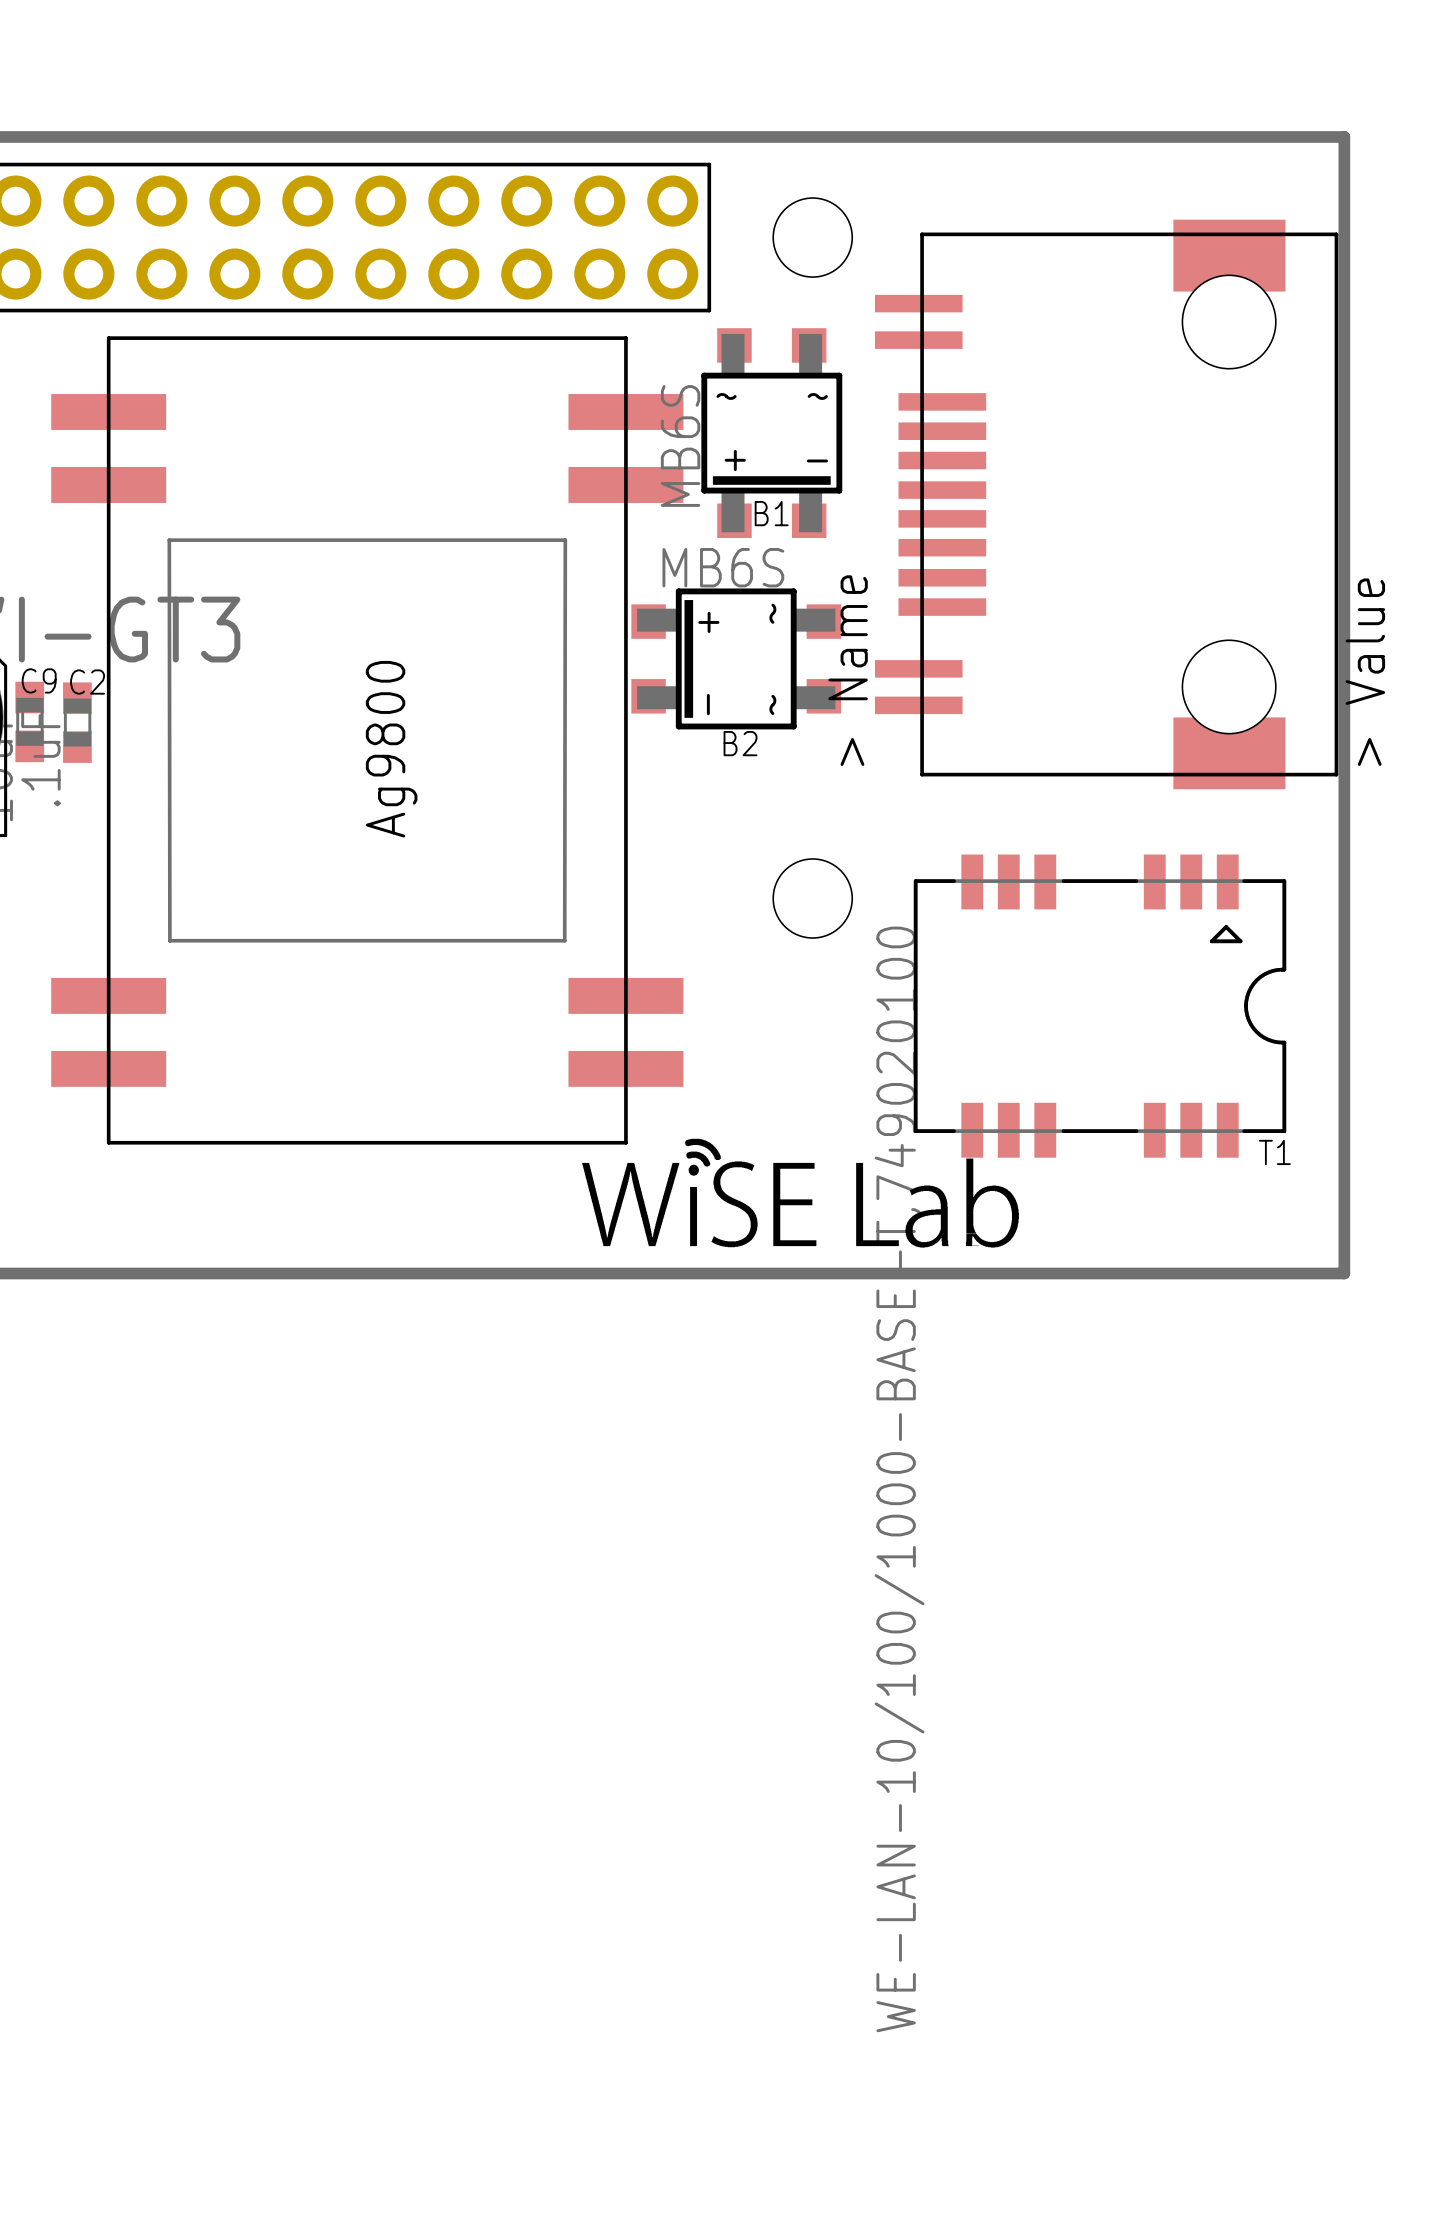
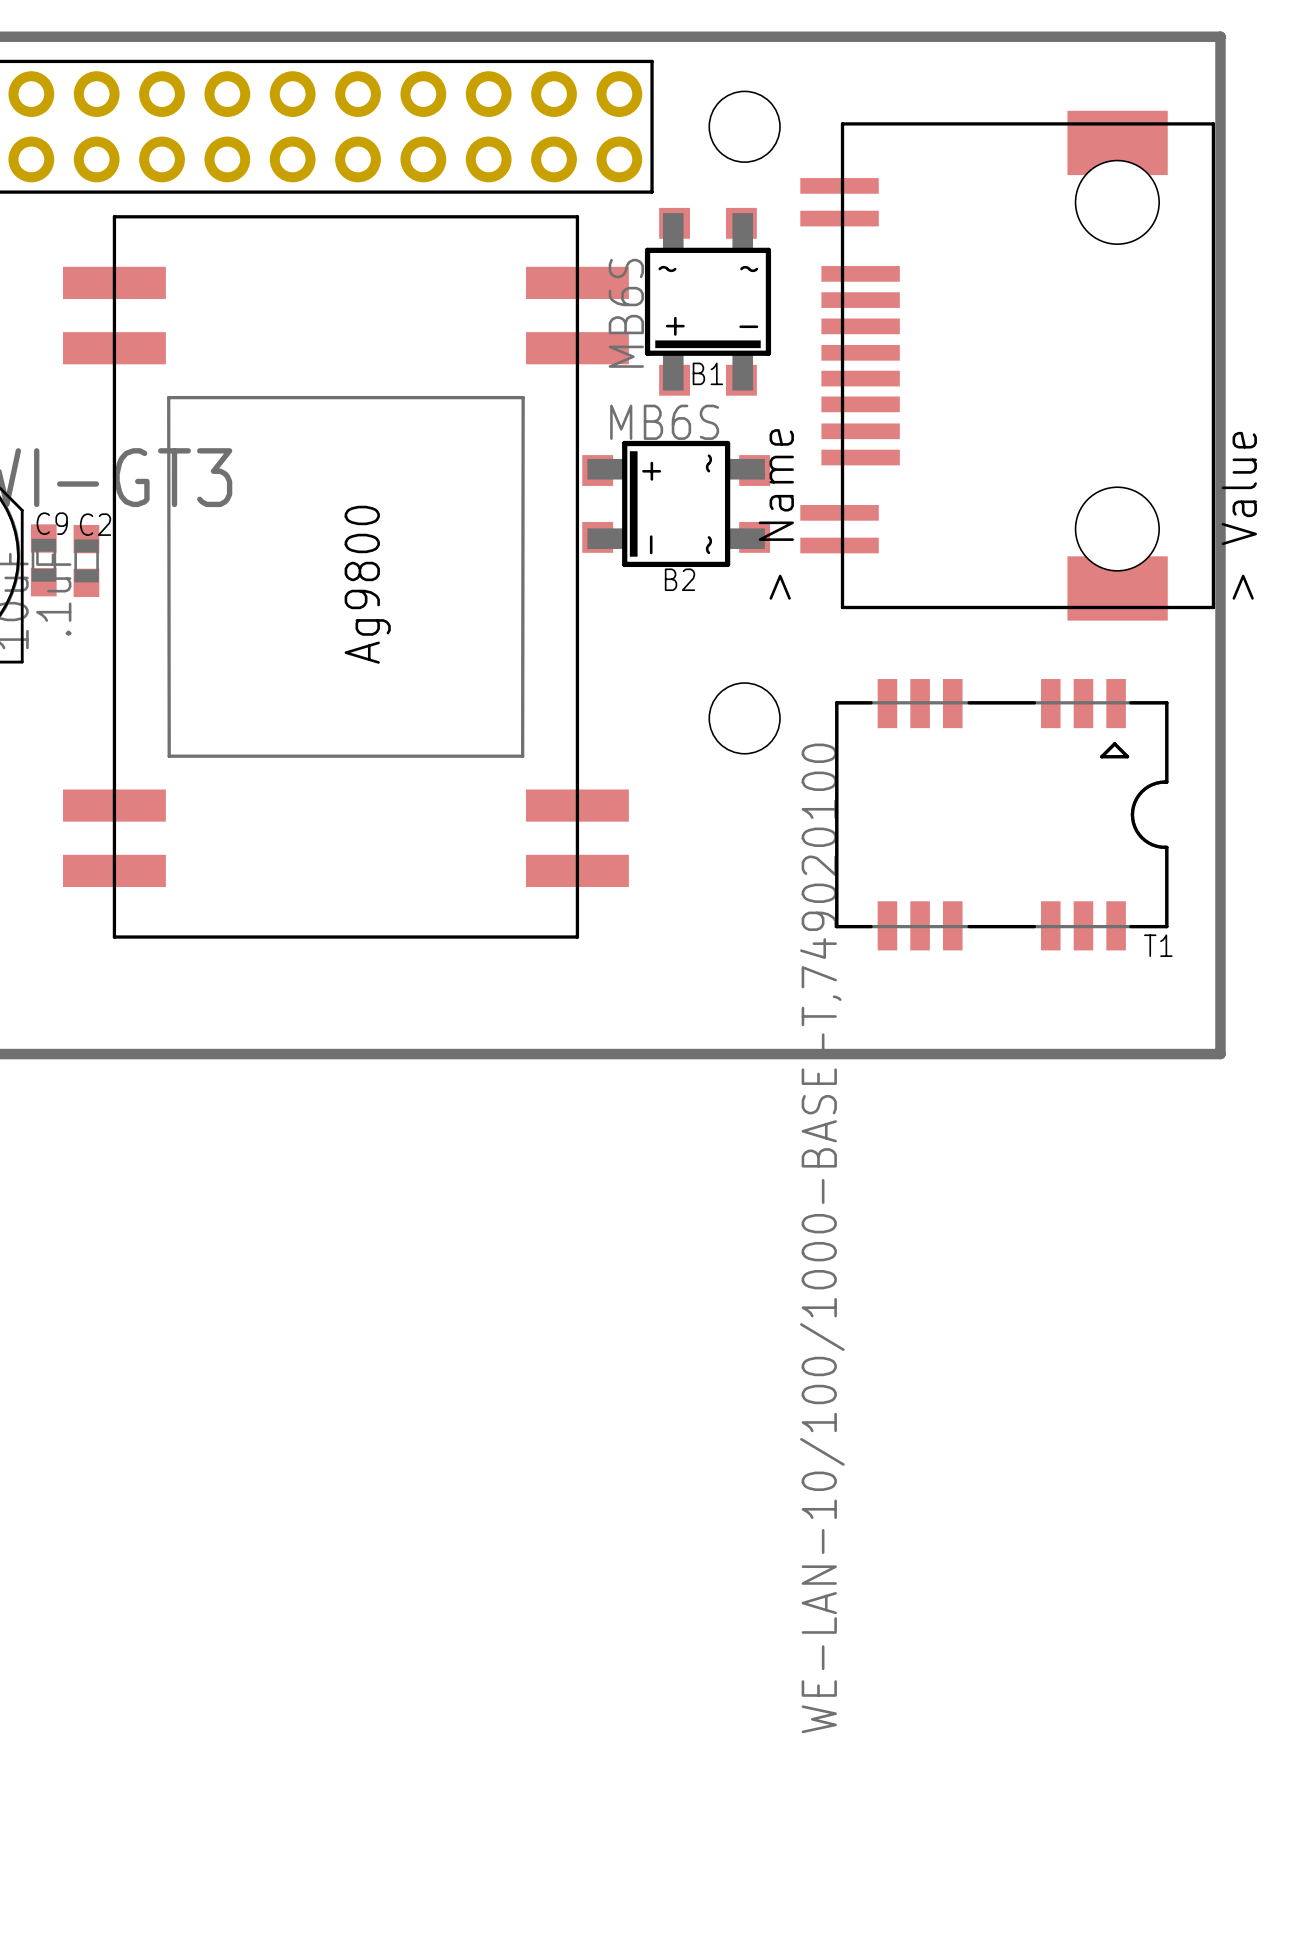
drawing: [582, 1138, 817, 1248] -> none
drawing: [856, 1158, 1019, 1248] -> none

